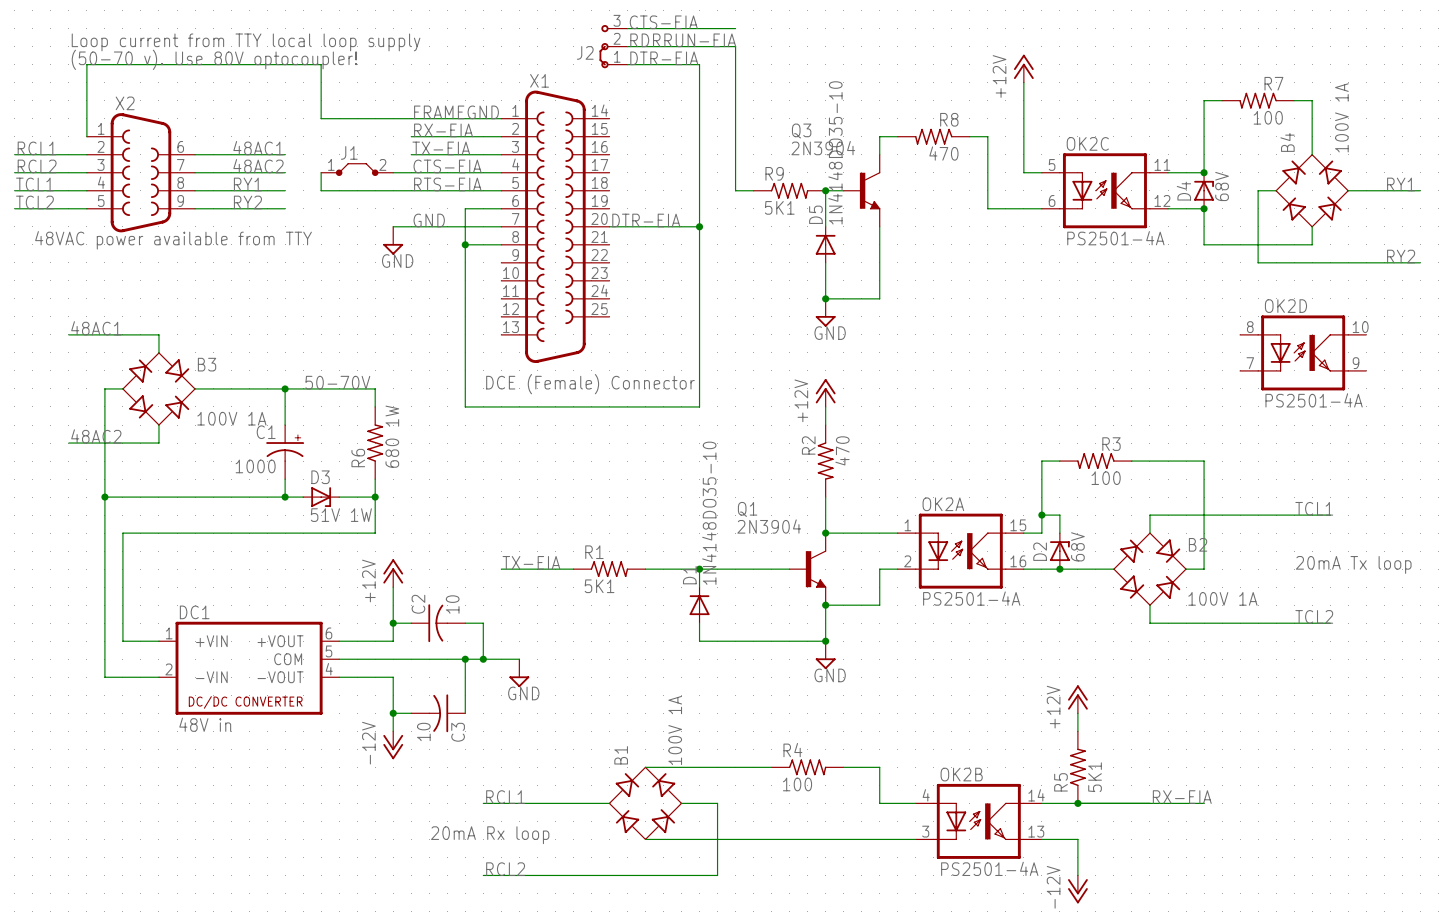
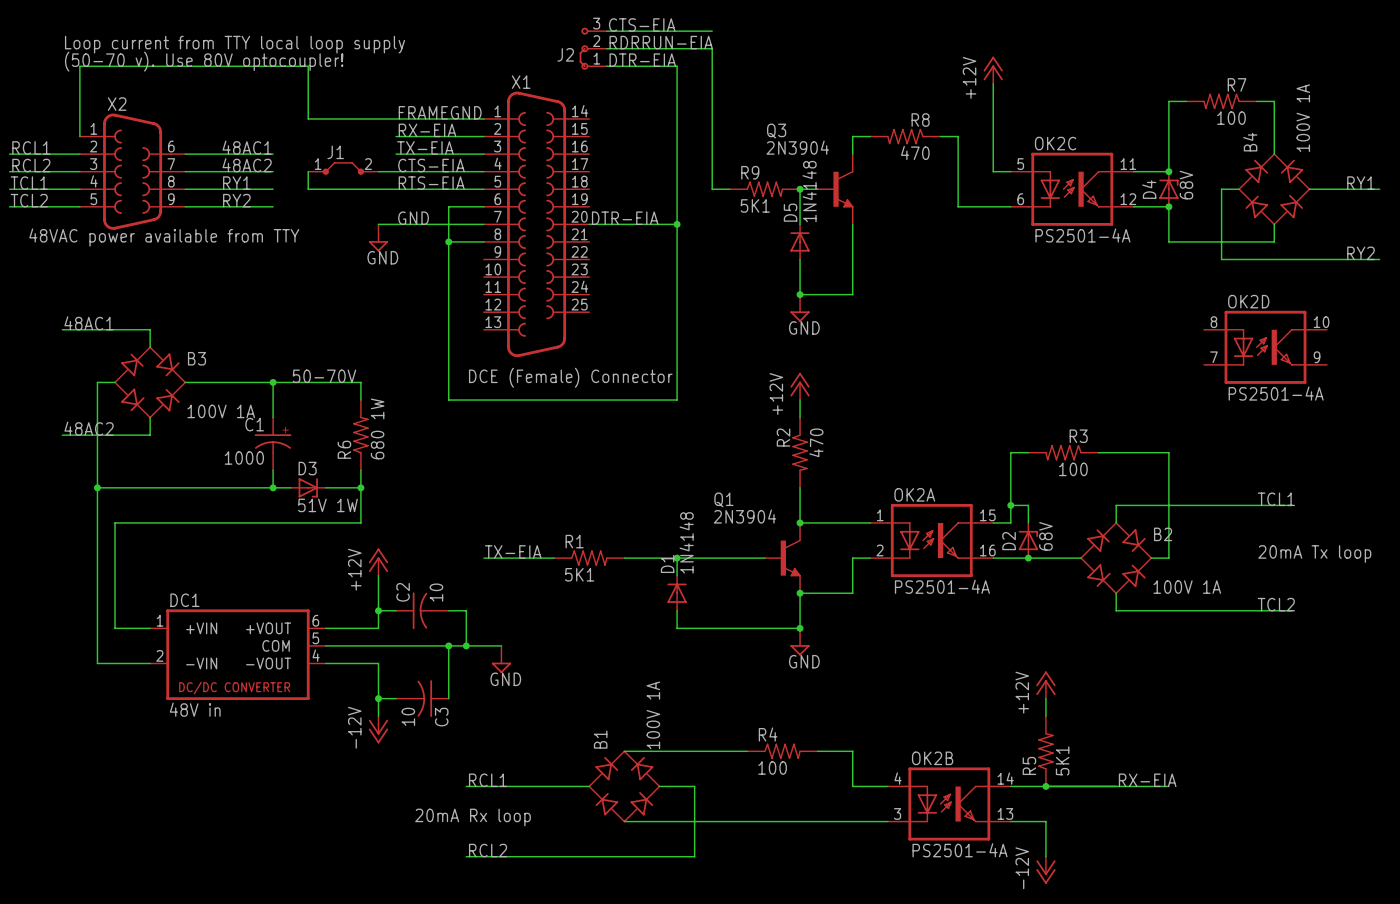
D5 value: 1N4148DO35-10 (835, 152) -> 1N4148 (809, 191)
D1 value: 1N4148DO35-10 (709, 513) -> 1N4148 (686, 542)

